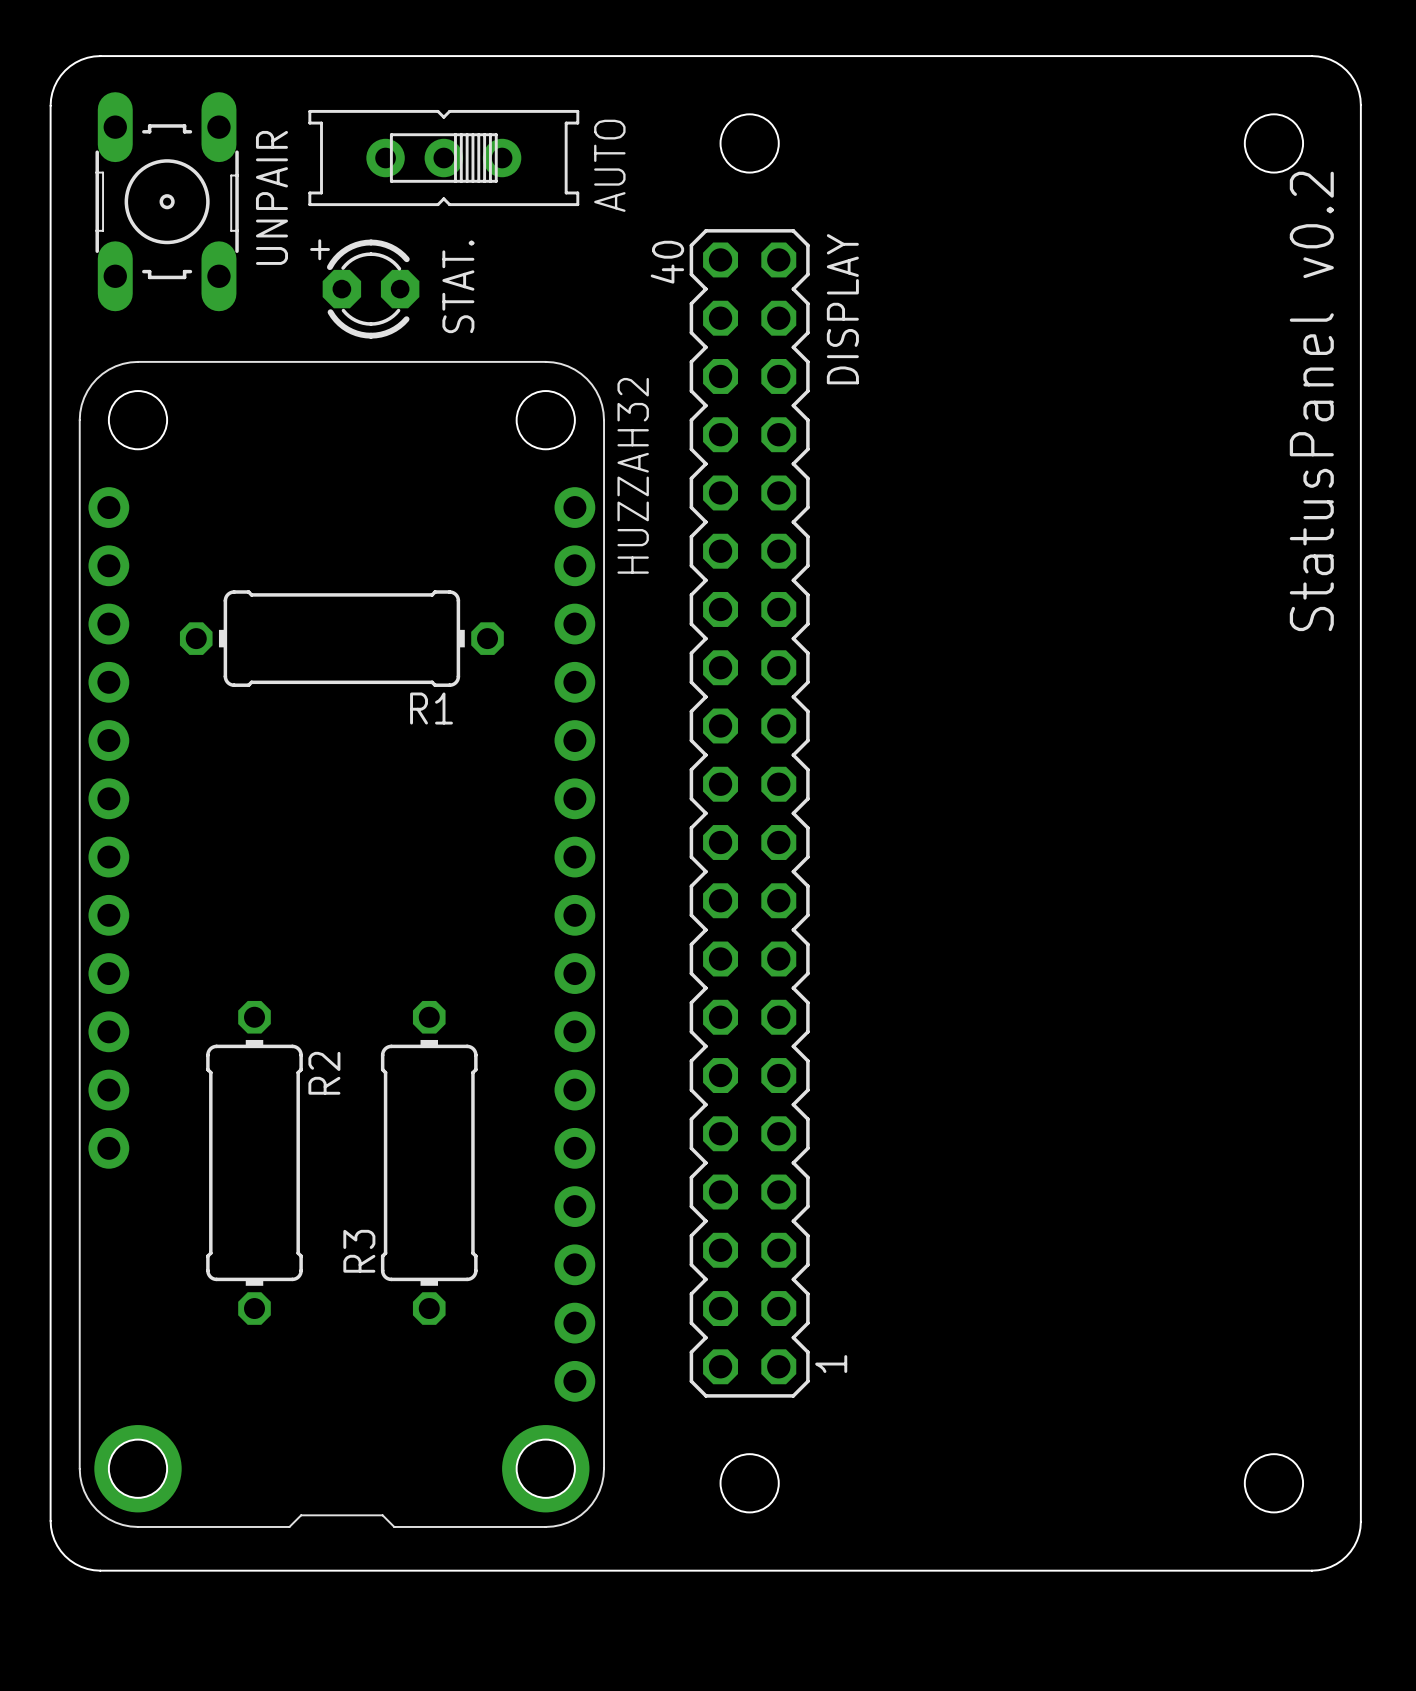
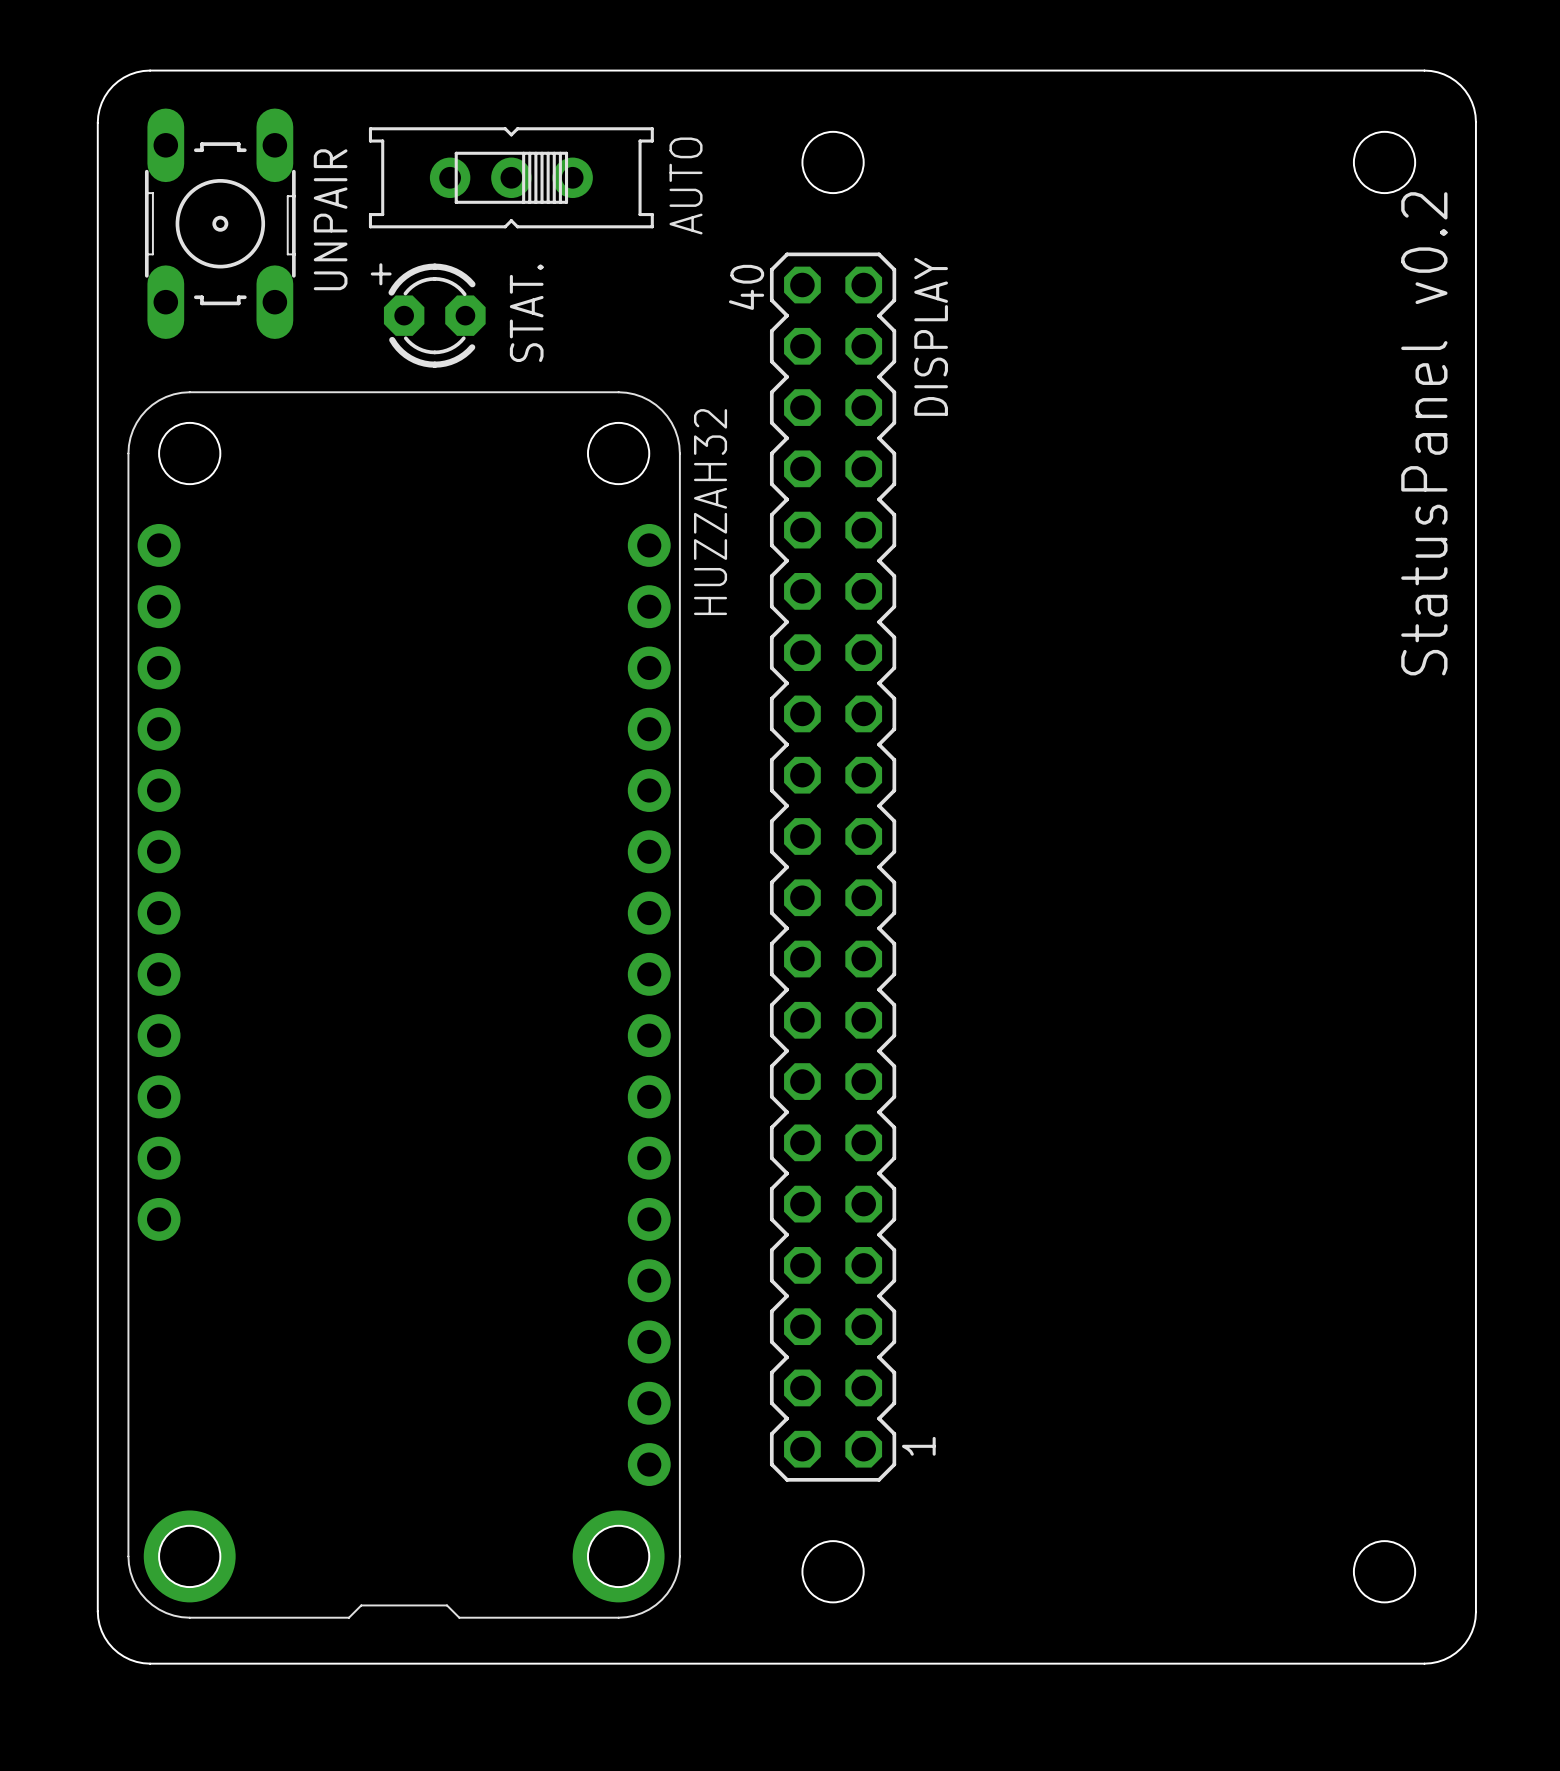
R1: (341, 638) -> none
R2: (254, 1162) -> none
R3: (429, 1162) -> none

